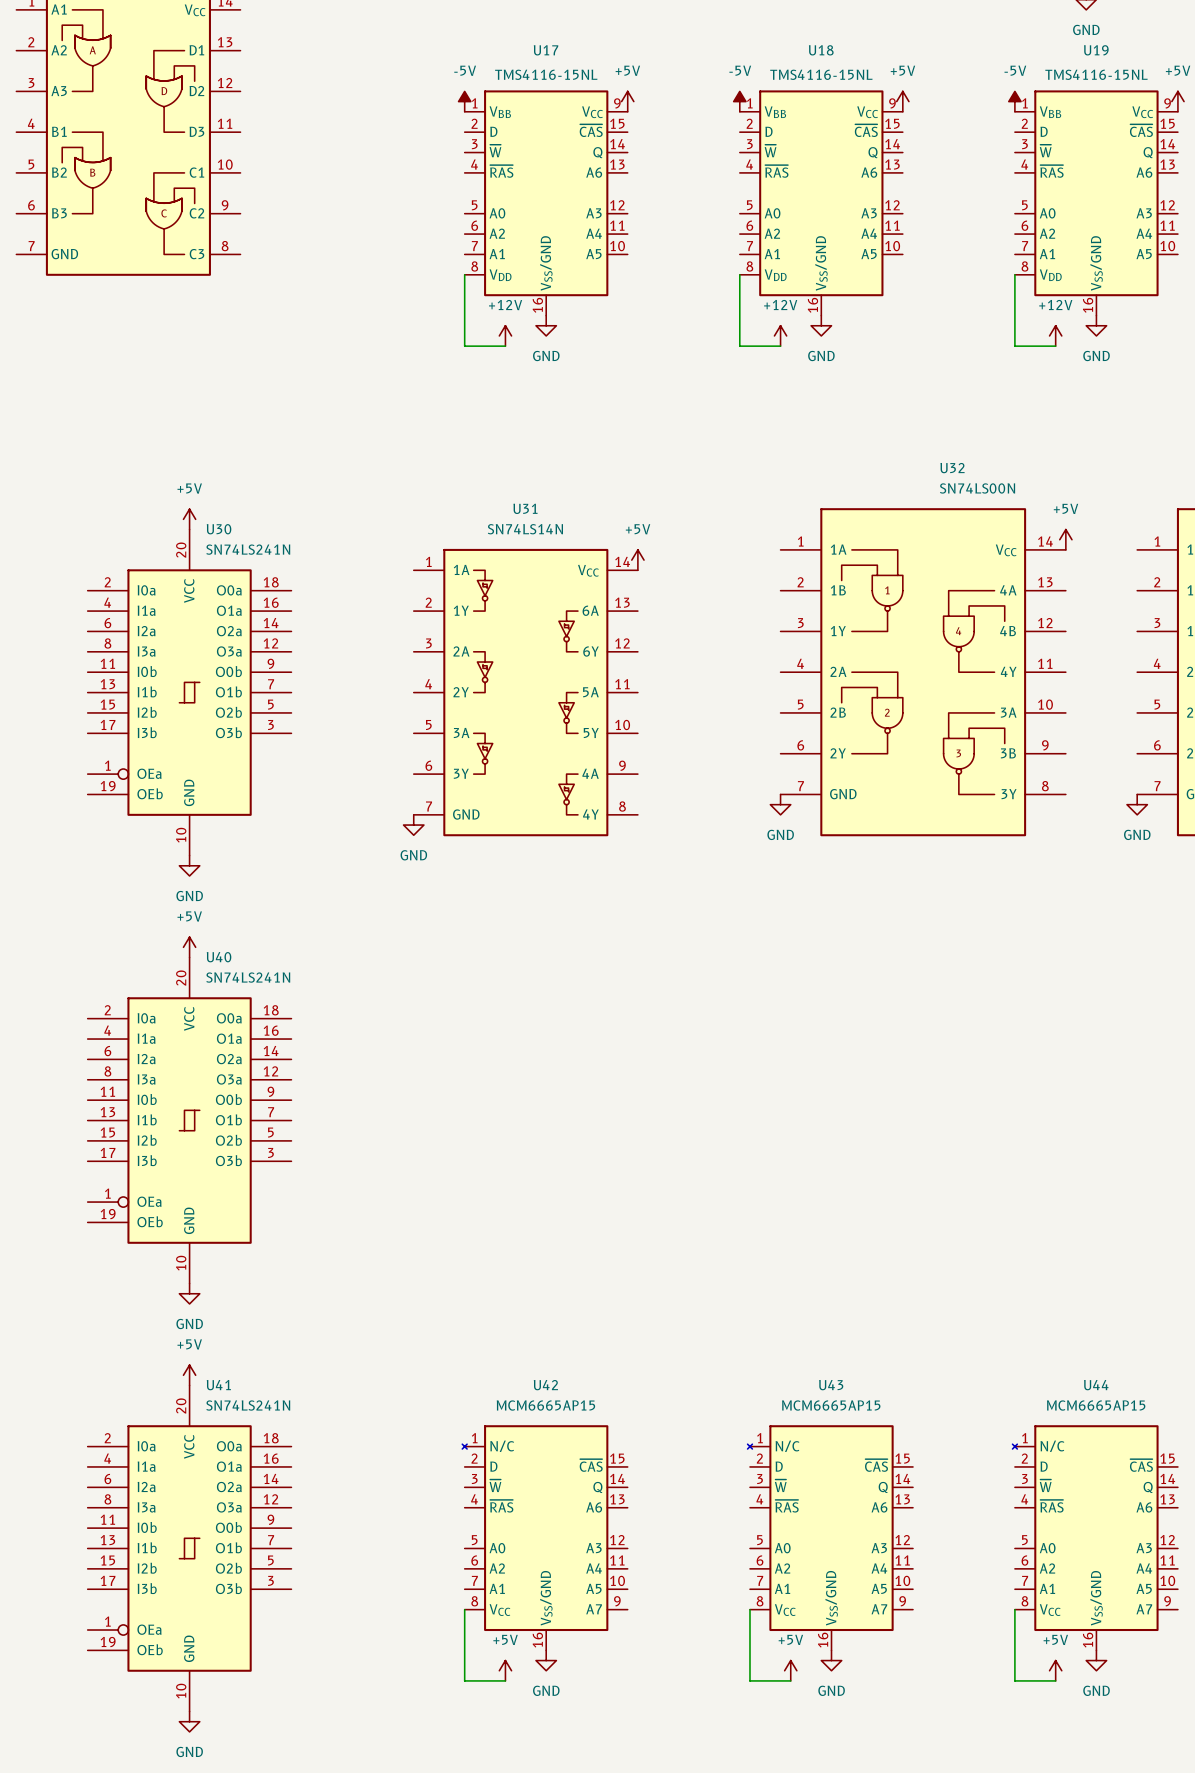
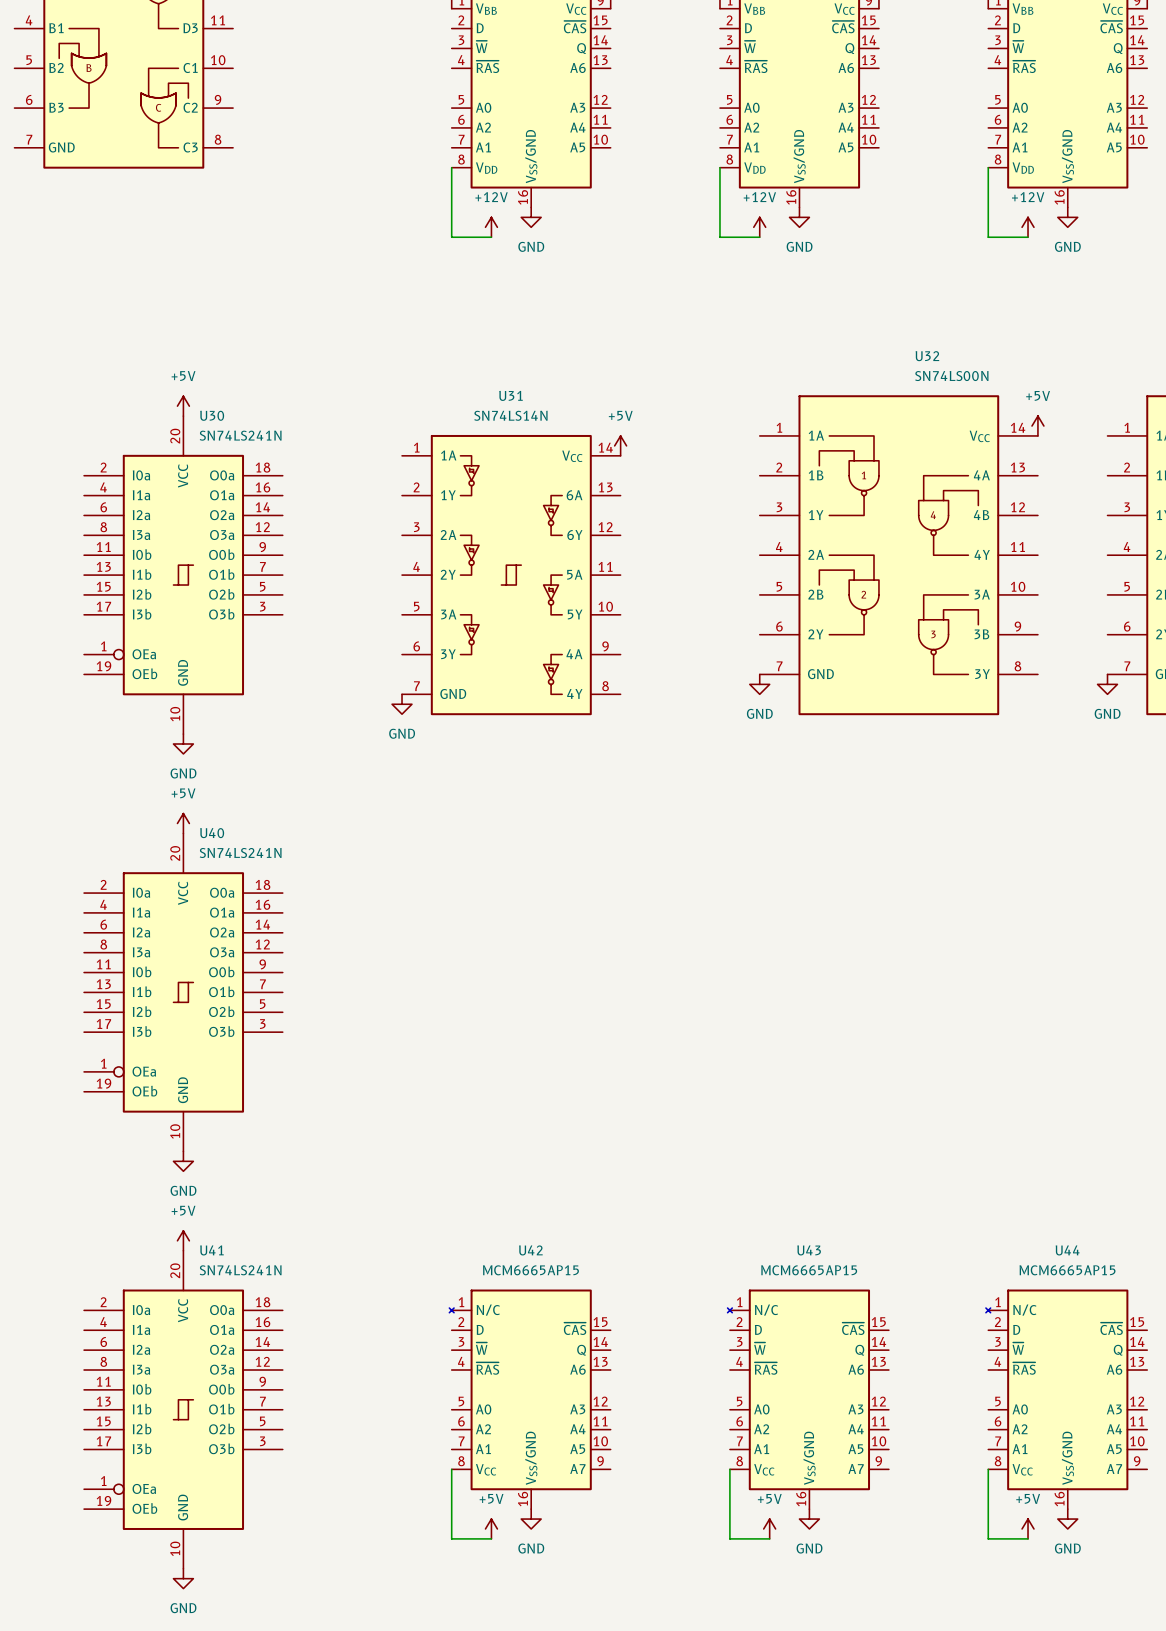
U31 symbol: [413, 548, 638, 837] -> [402, 434, 621, 716]

